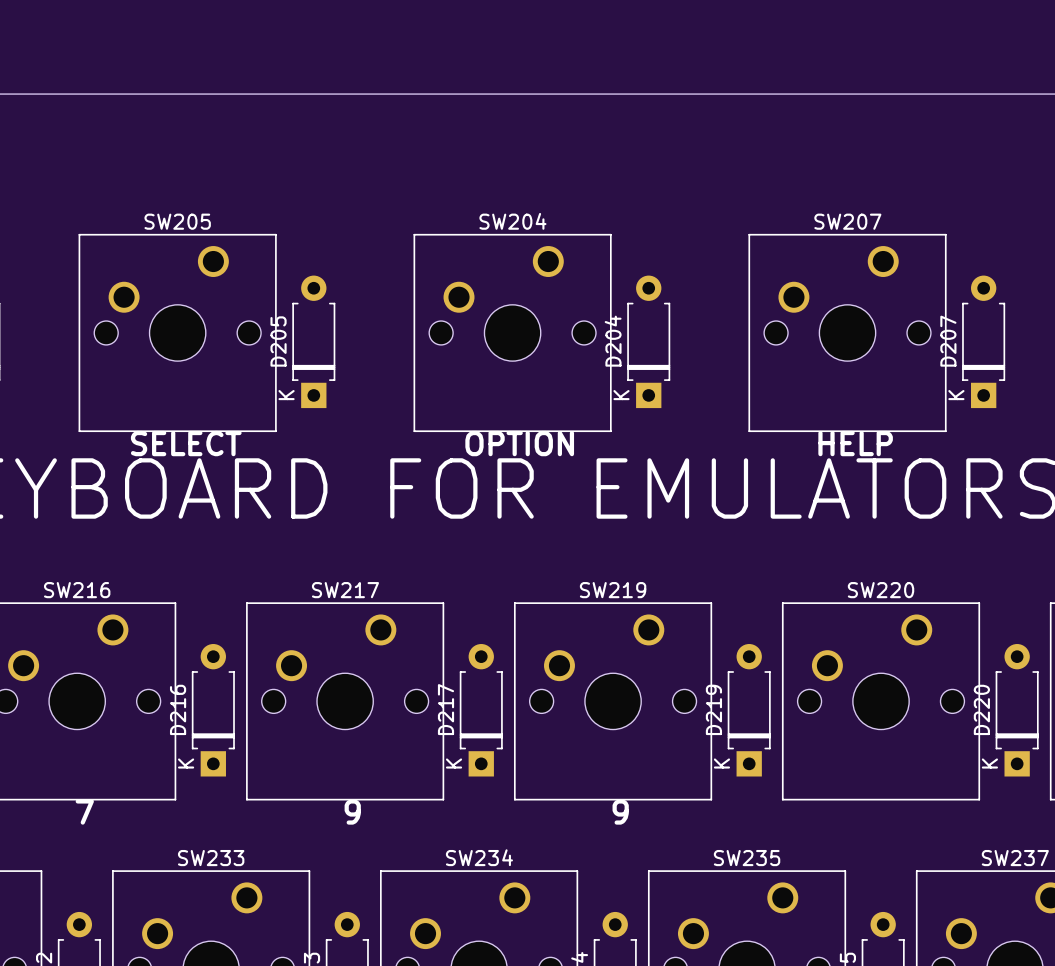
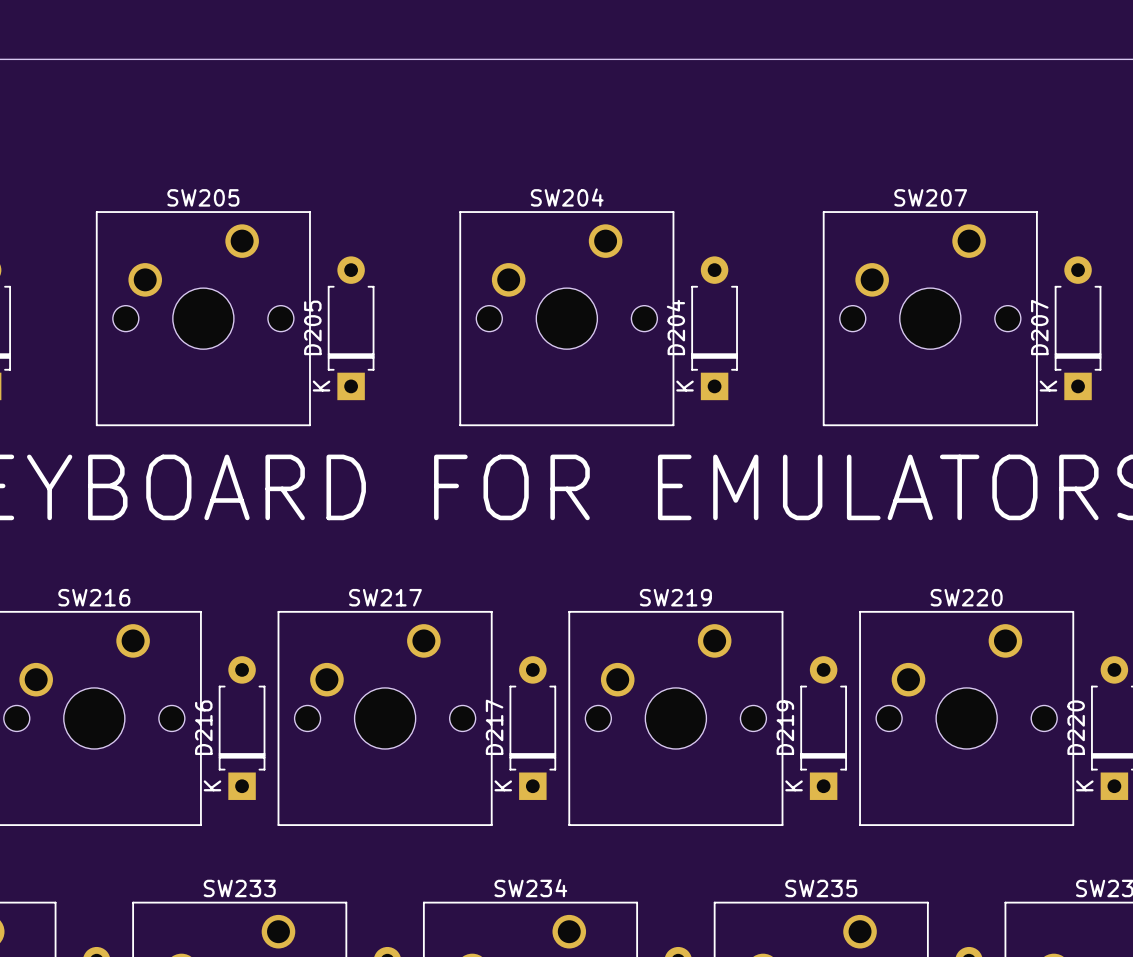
text: SELECT (186, 443) -> none
text: OPTION (519, 443) -> none
text: HELP (855, 443) -> none
text: 7 (84, 812) -> none
text: 9 (352, 812) -> none
text: 9 (620, 812) -> none

